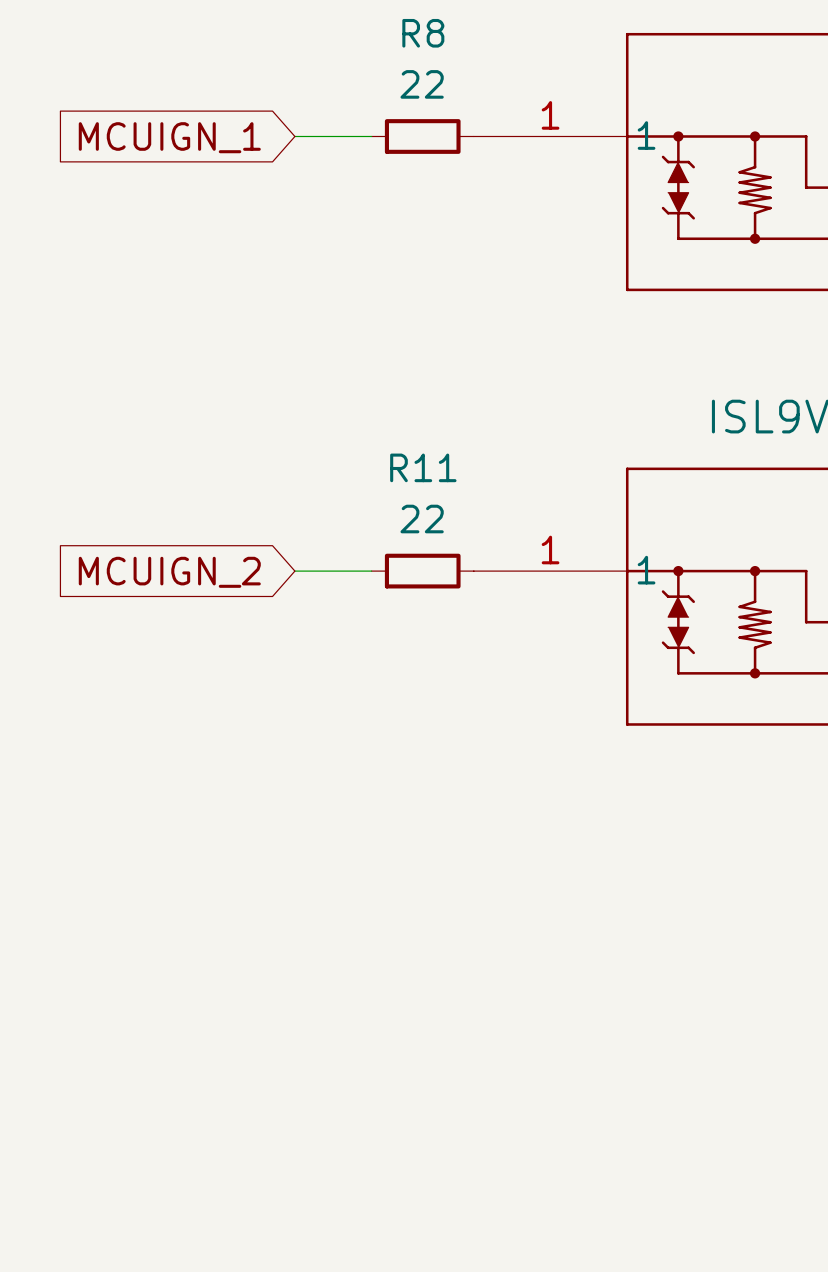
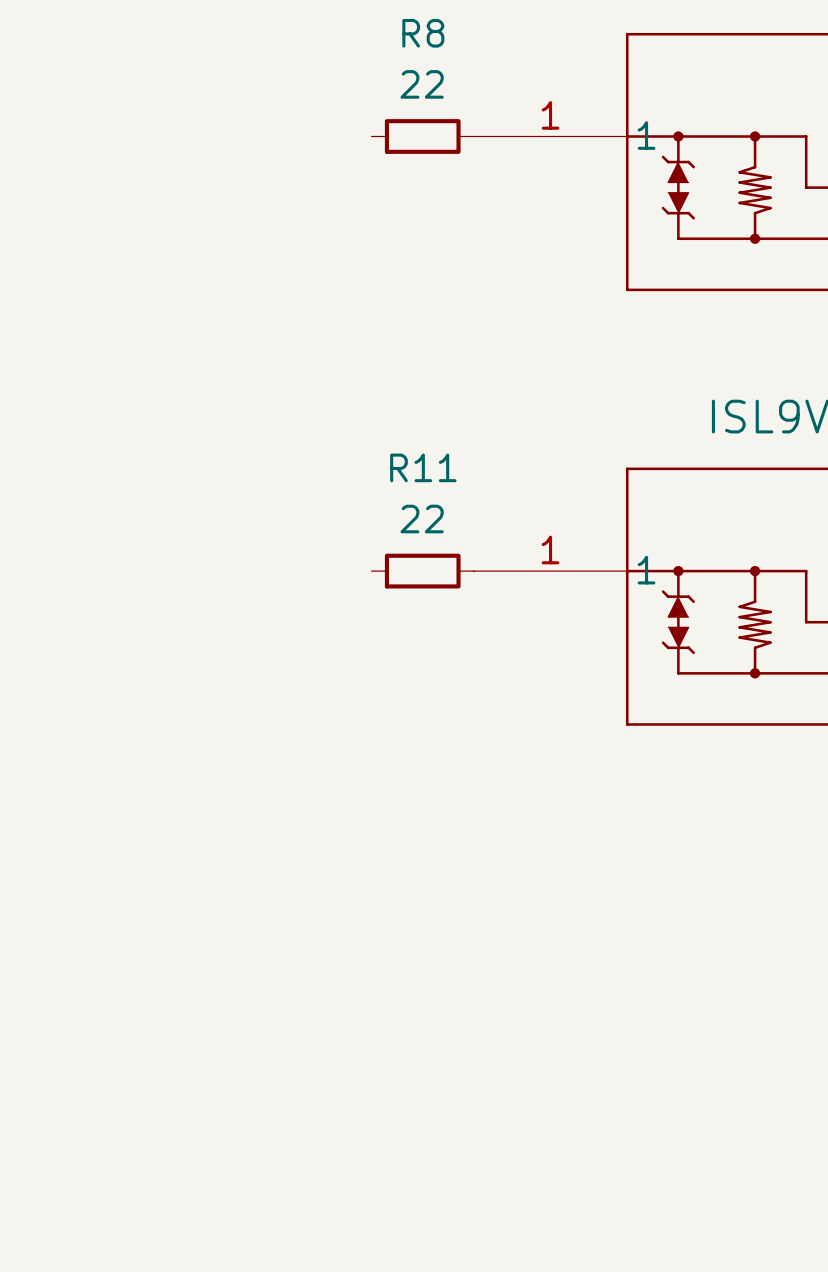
wire: (294, 136) (371, 136) -> none
global label: MCUIGN_1 (169, 137) -> none
wire: (294, 571) (371, 571) -> none
global label: MCUIGN_2 (169, 572) -> none

